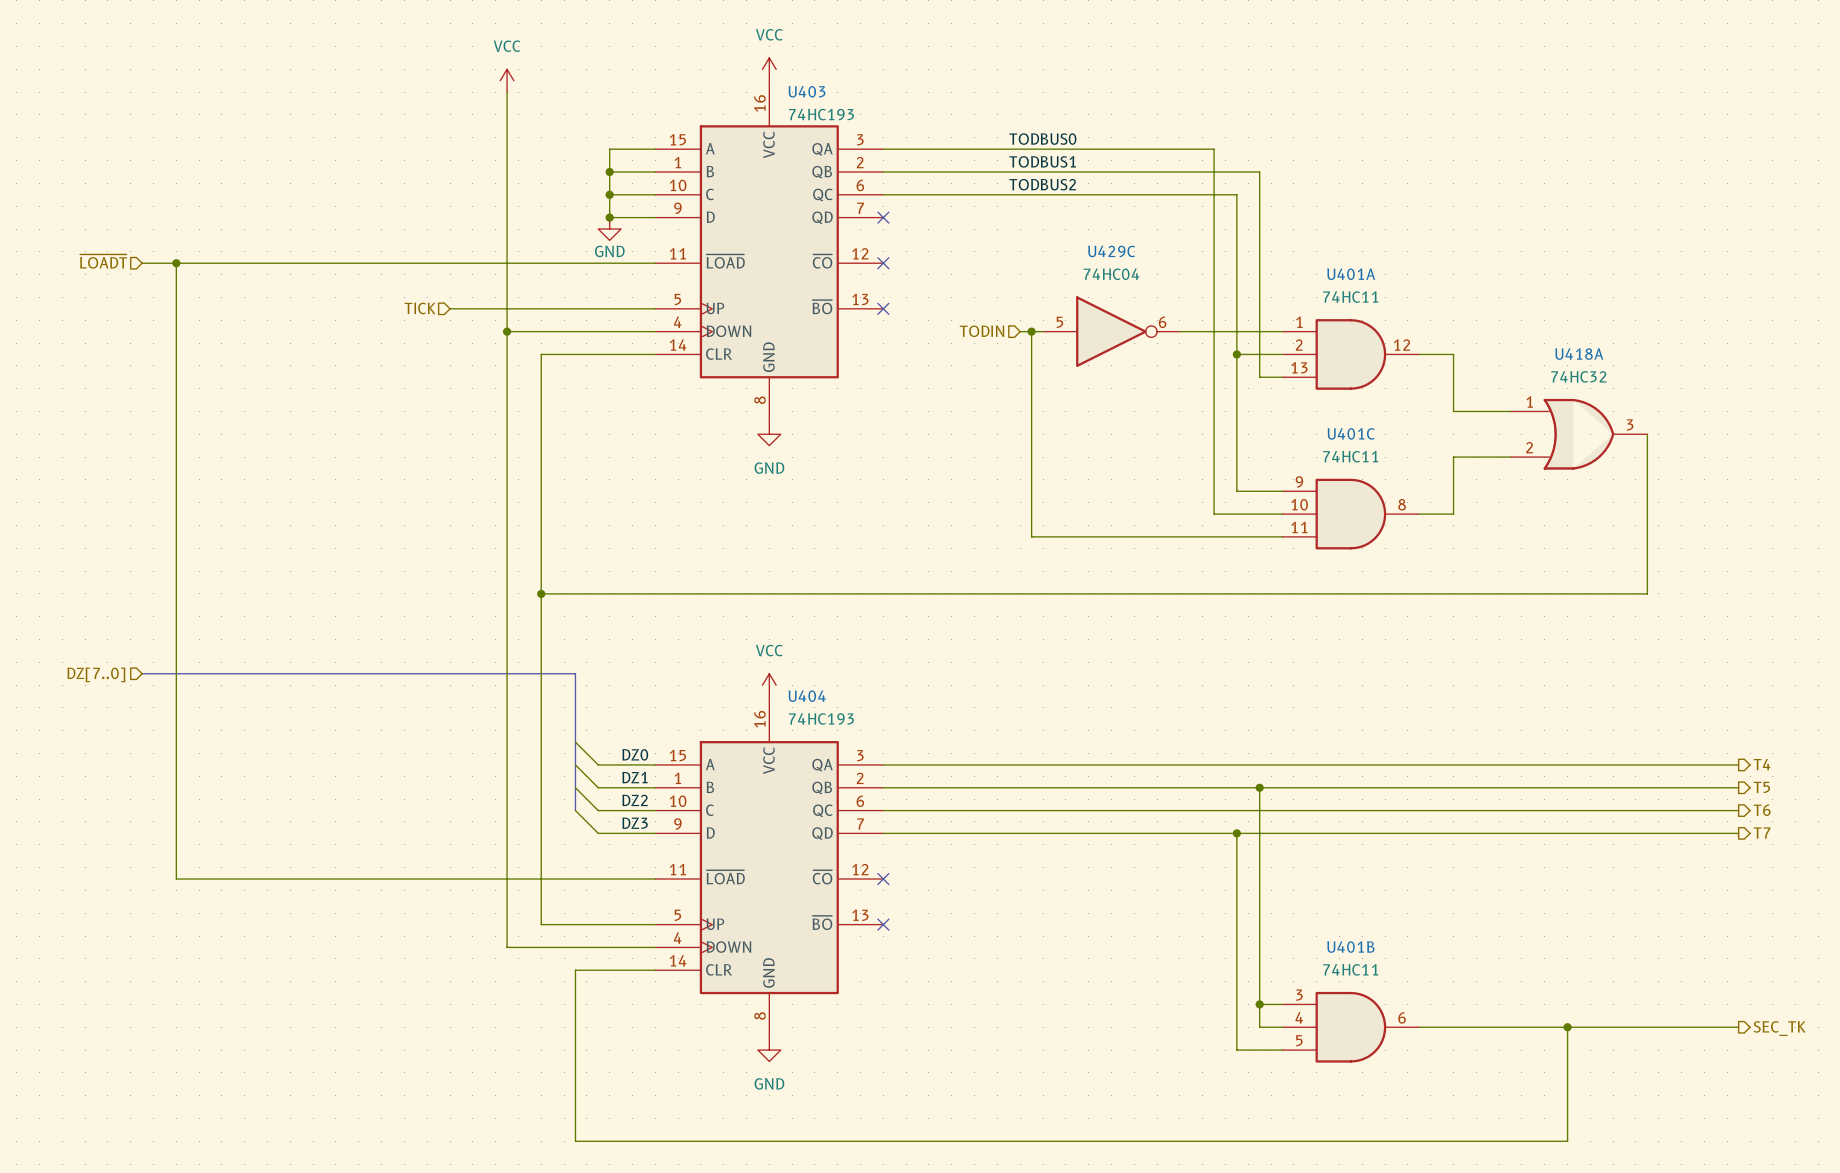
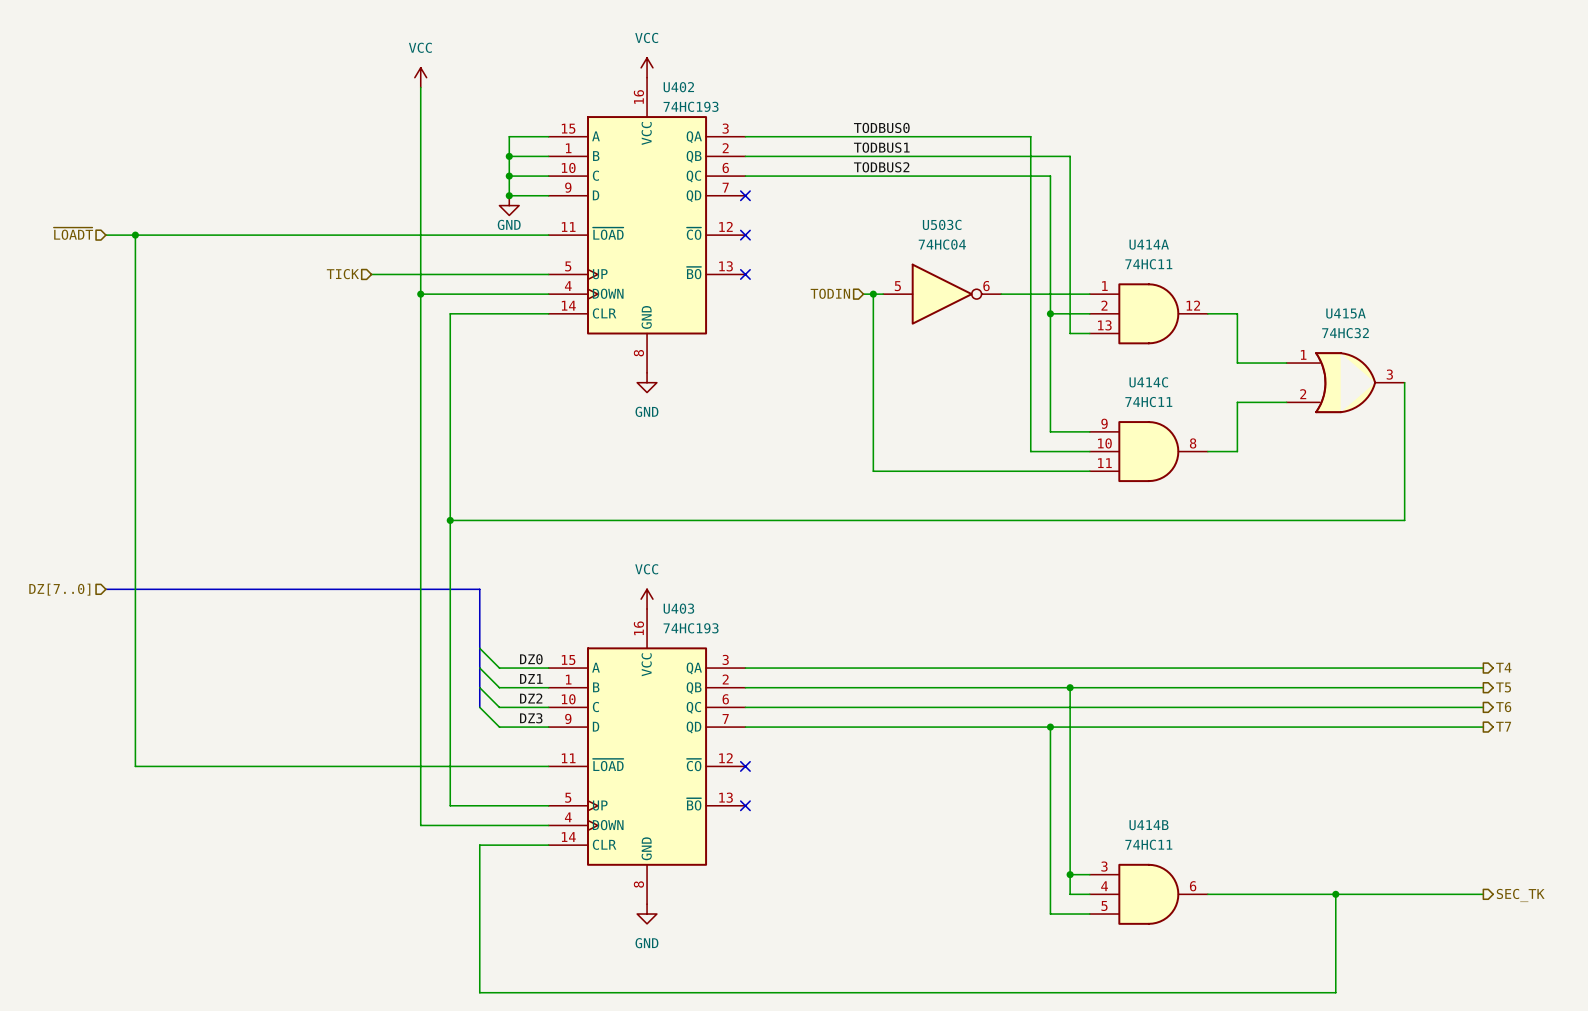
U403 name: U403 (806, 91) -> U402 (678, 87)
U429C name: U429C (1111, 251) -> U503C (942, 224)
U401A name: U401A (1351, 274) -> U414A (1149, 244)
U418A name: U418A (1579, 354) -> U415A (1345, 313)
U401C name: U401C (1351, 433) -> U414C (1148, 382)
U404 name: U404 (807, 696) -> U403 (678, 608)
U401B name: U401B (1350, 947) -> U414B (1149, 825)

